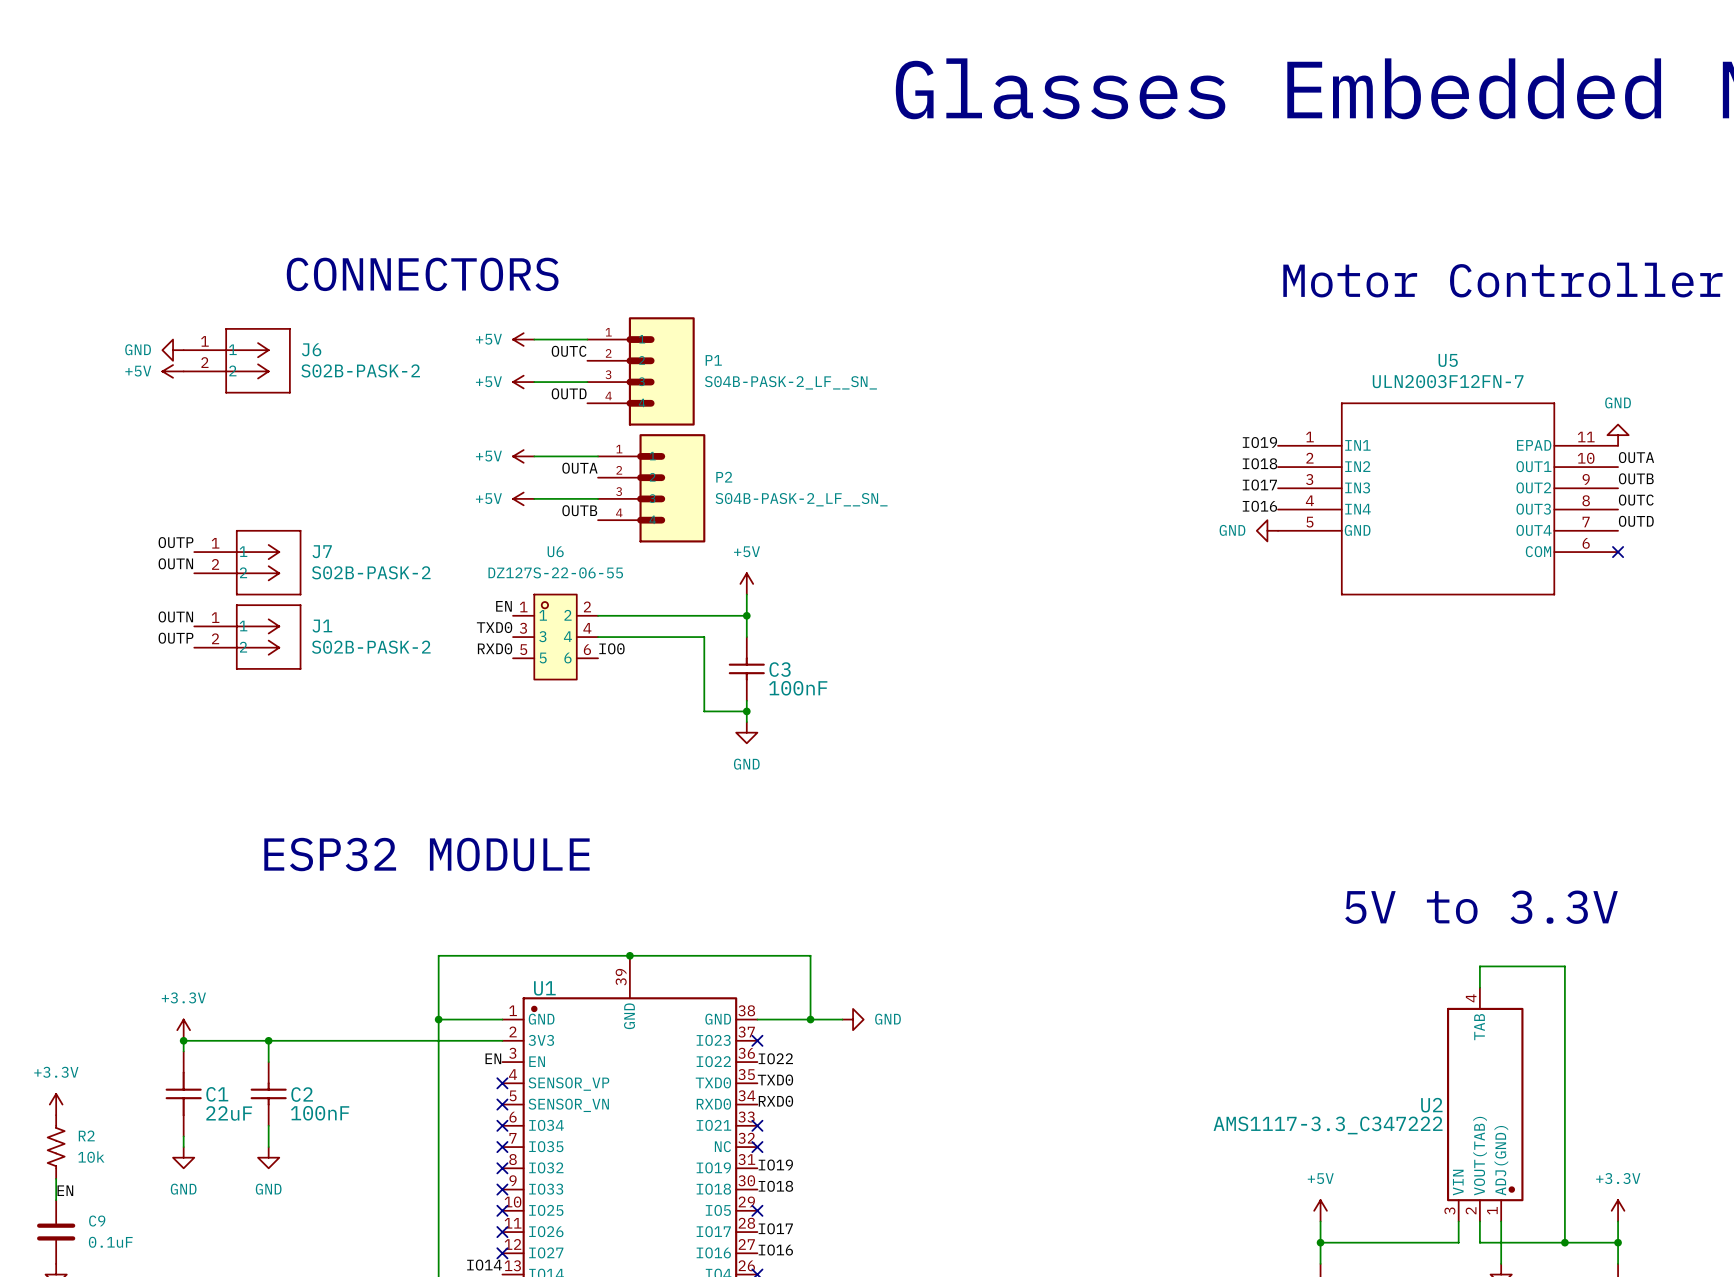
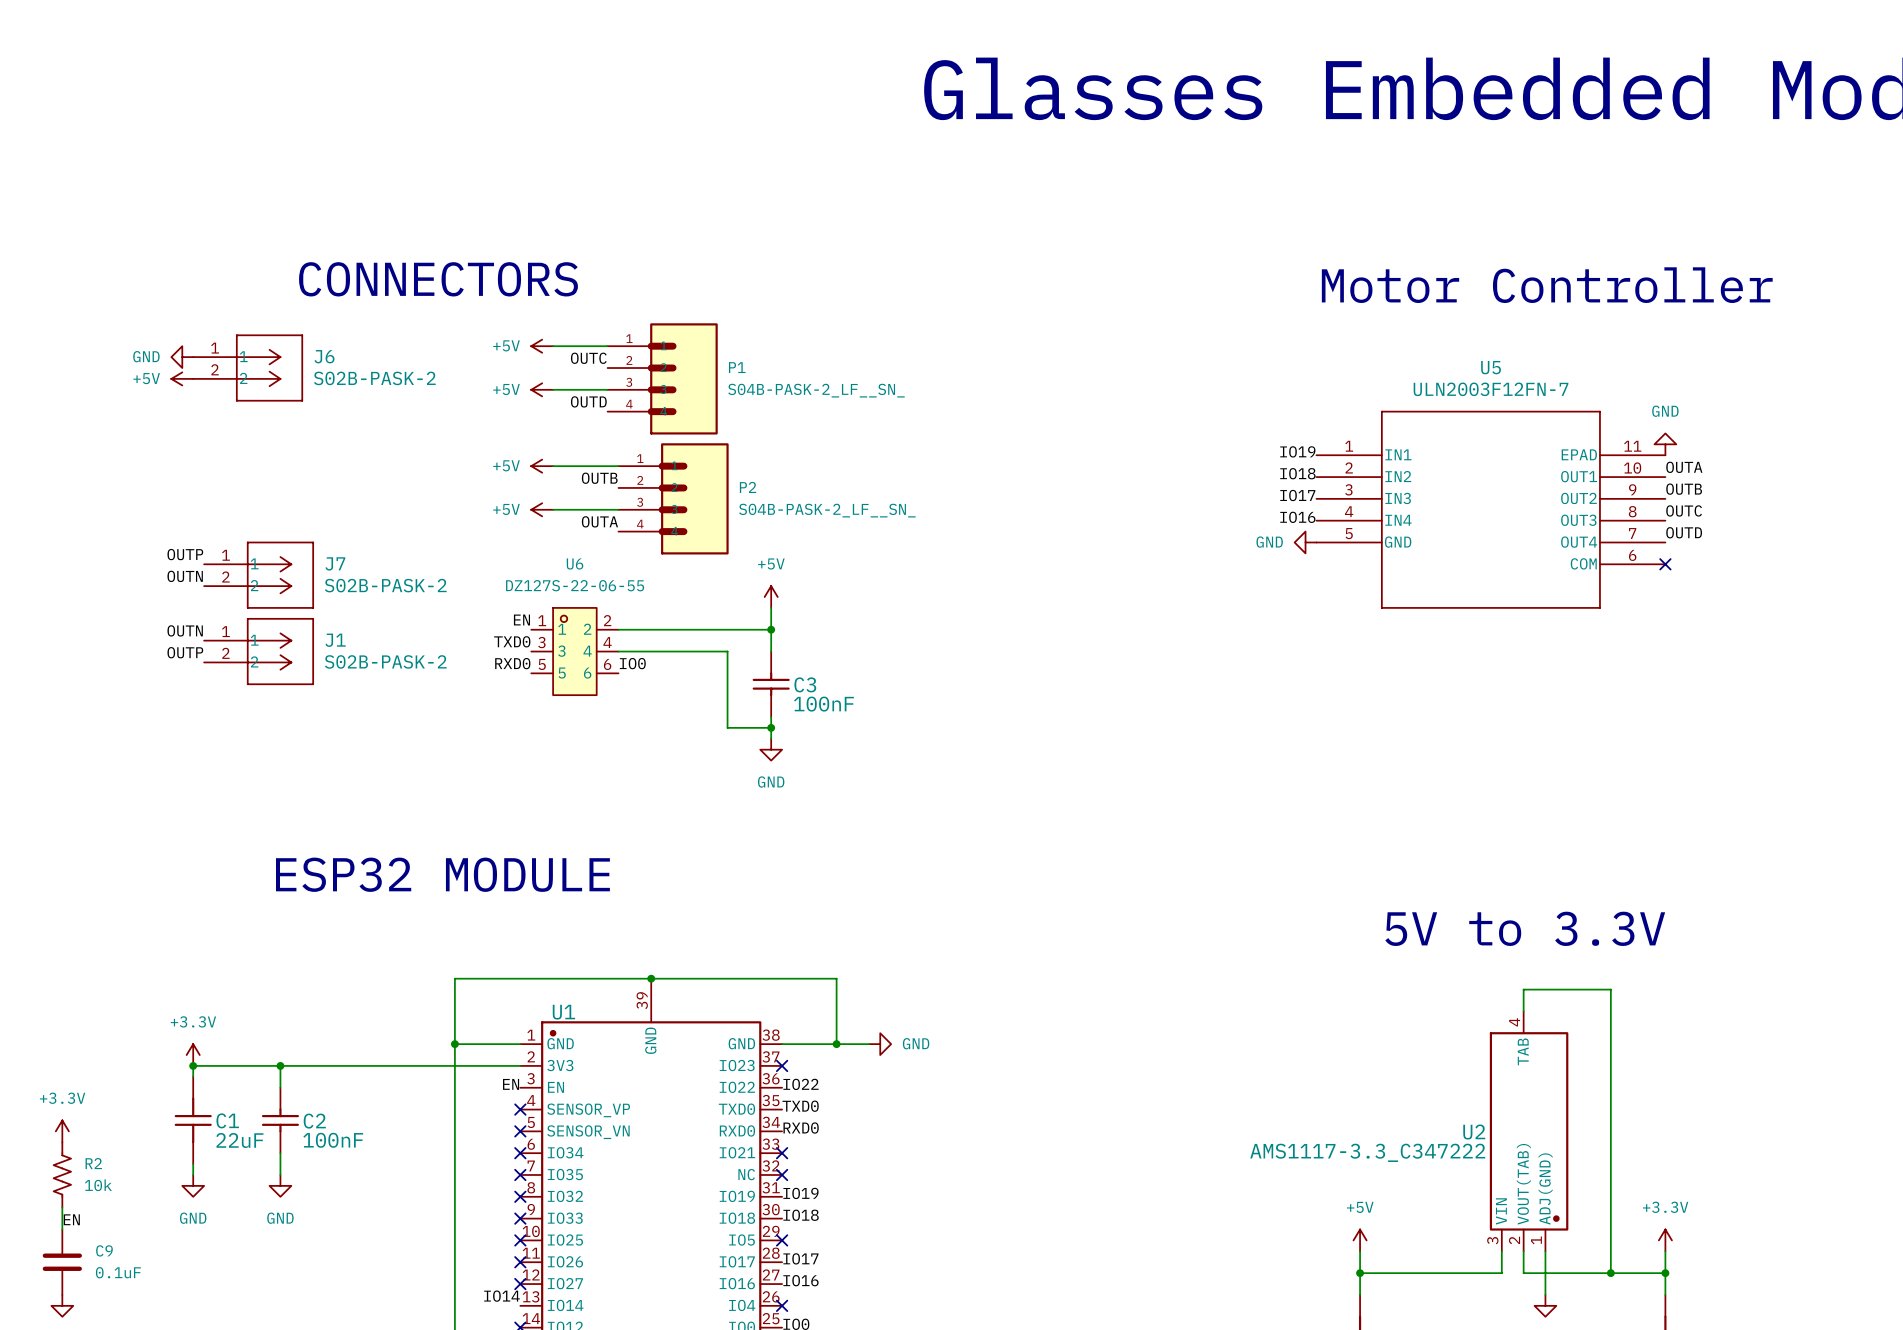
label: OUTA (579, 468) -> OUTB (599, 478)
label: OUTB (579, 510) -> OUTA (599, 521)

